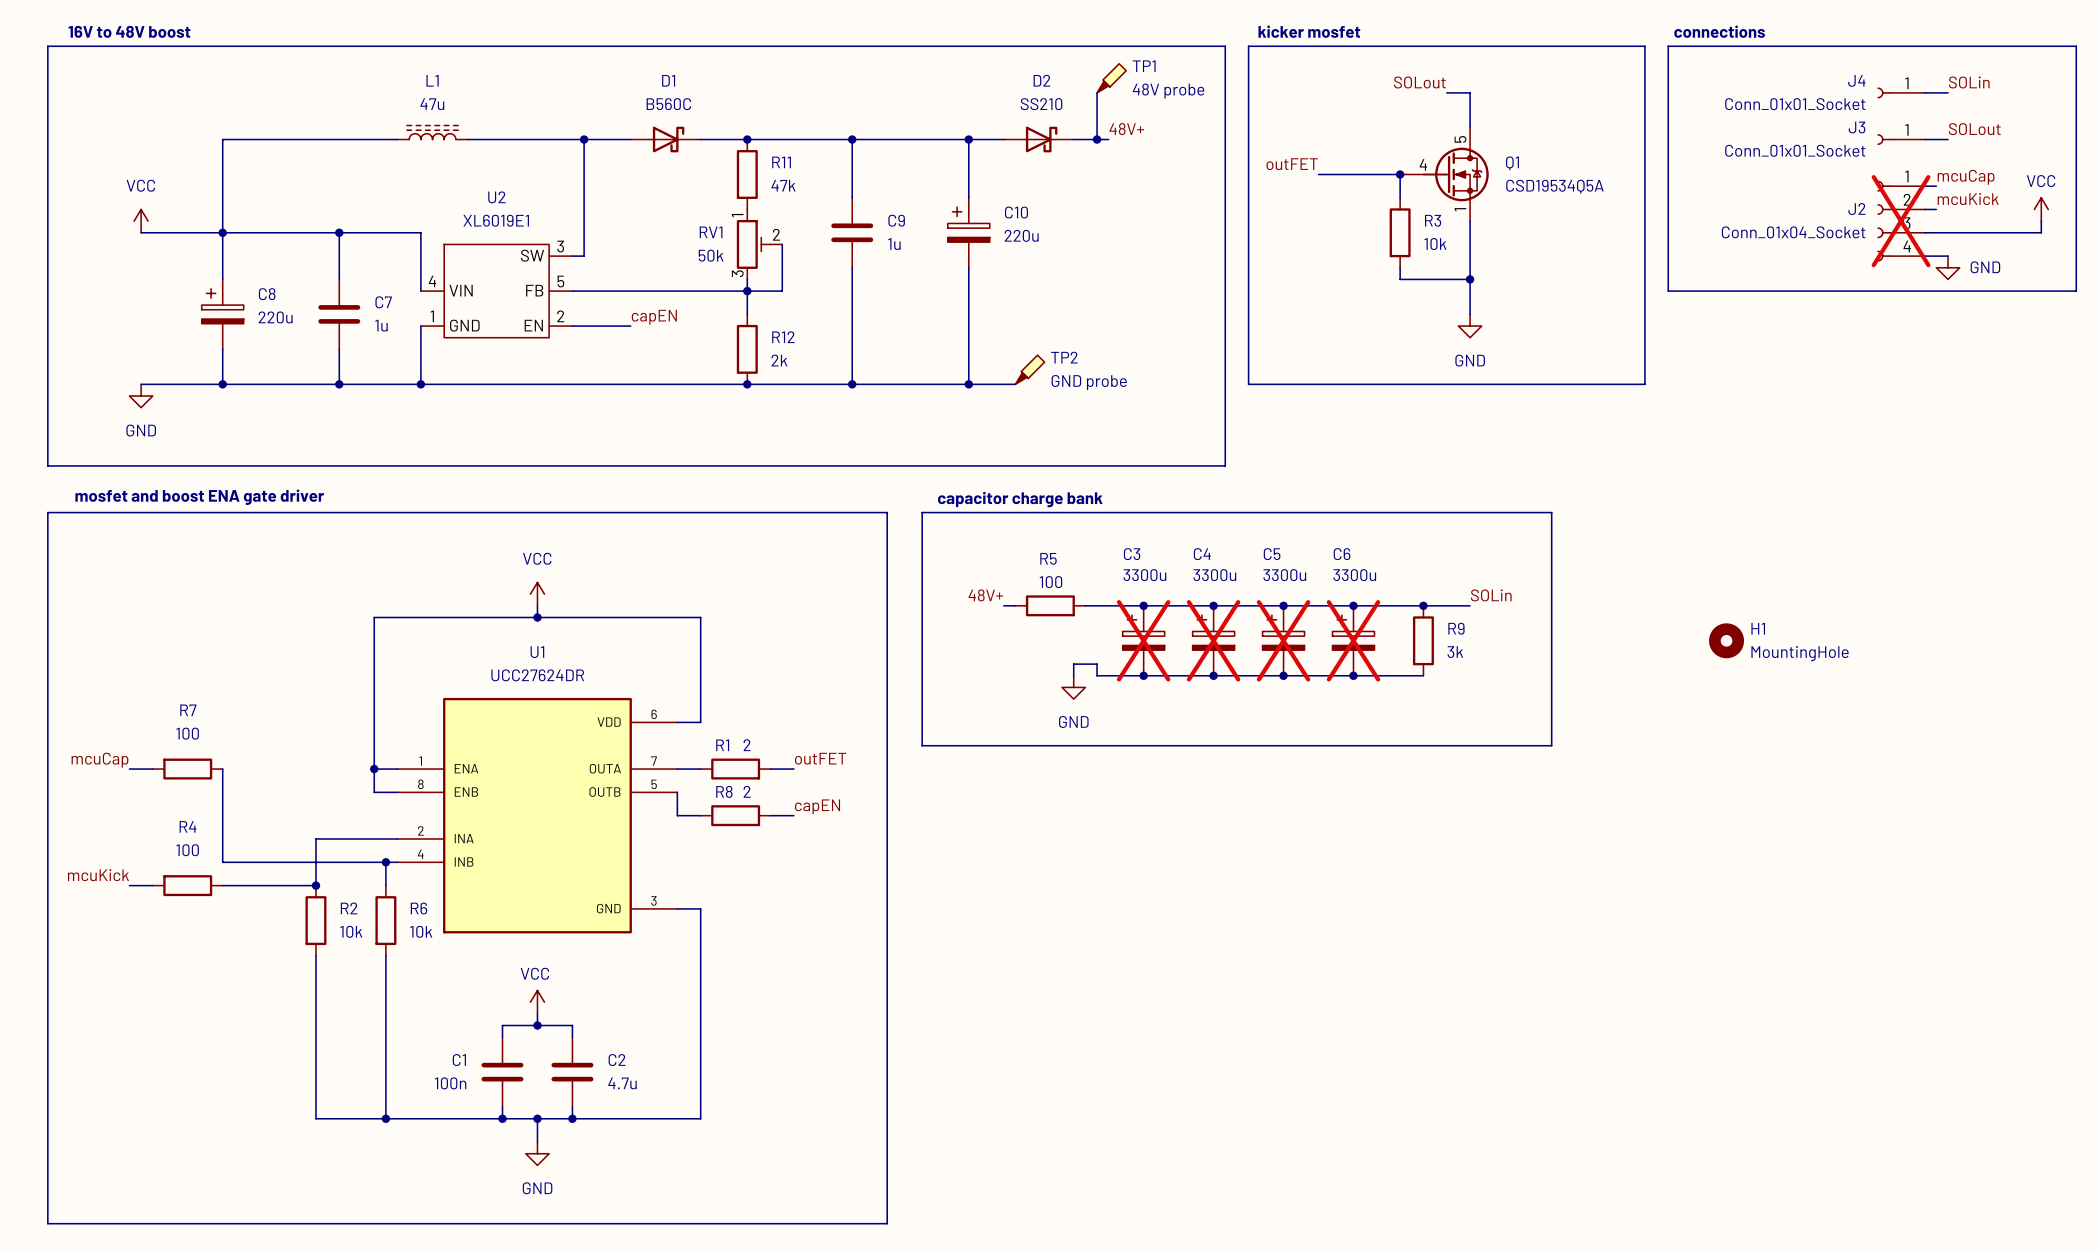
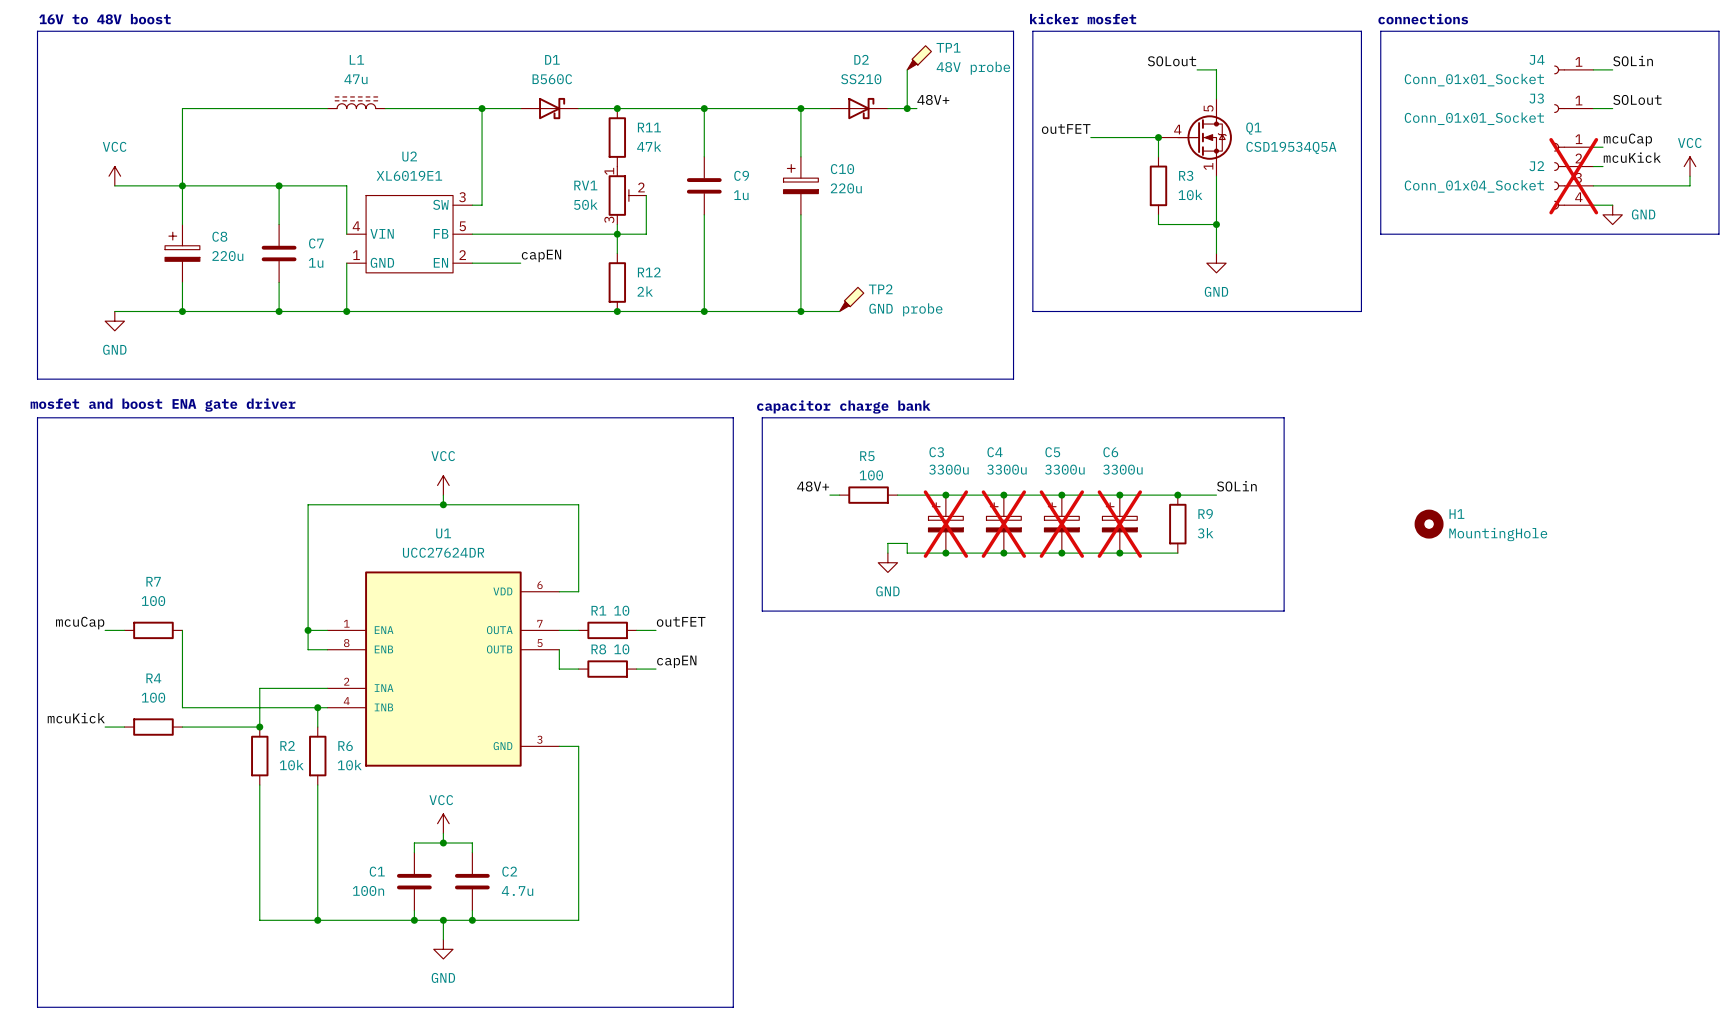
R1 value: 2 (747, 745) -> 10 (621, 610)
R8 value: 2 (747, 791) -> 10 (621, 649)

